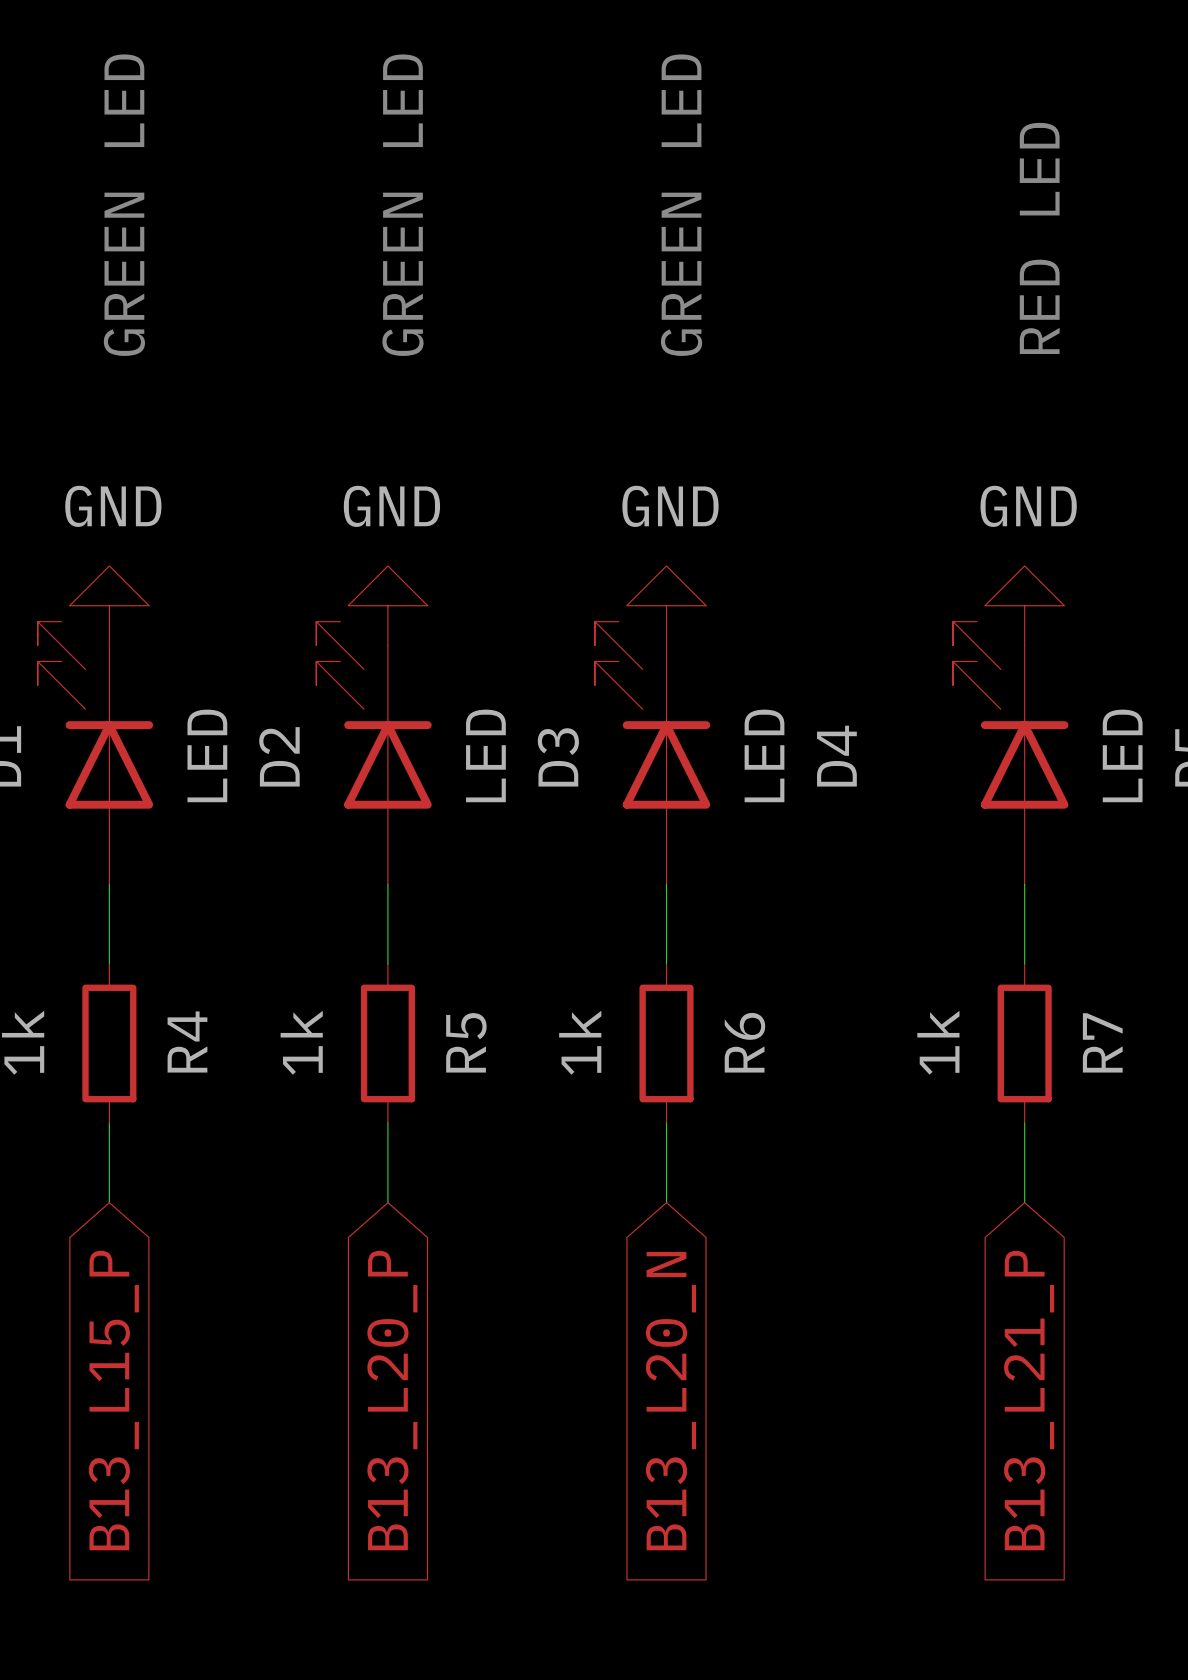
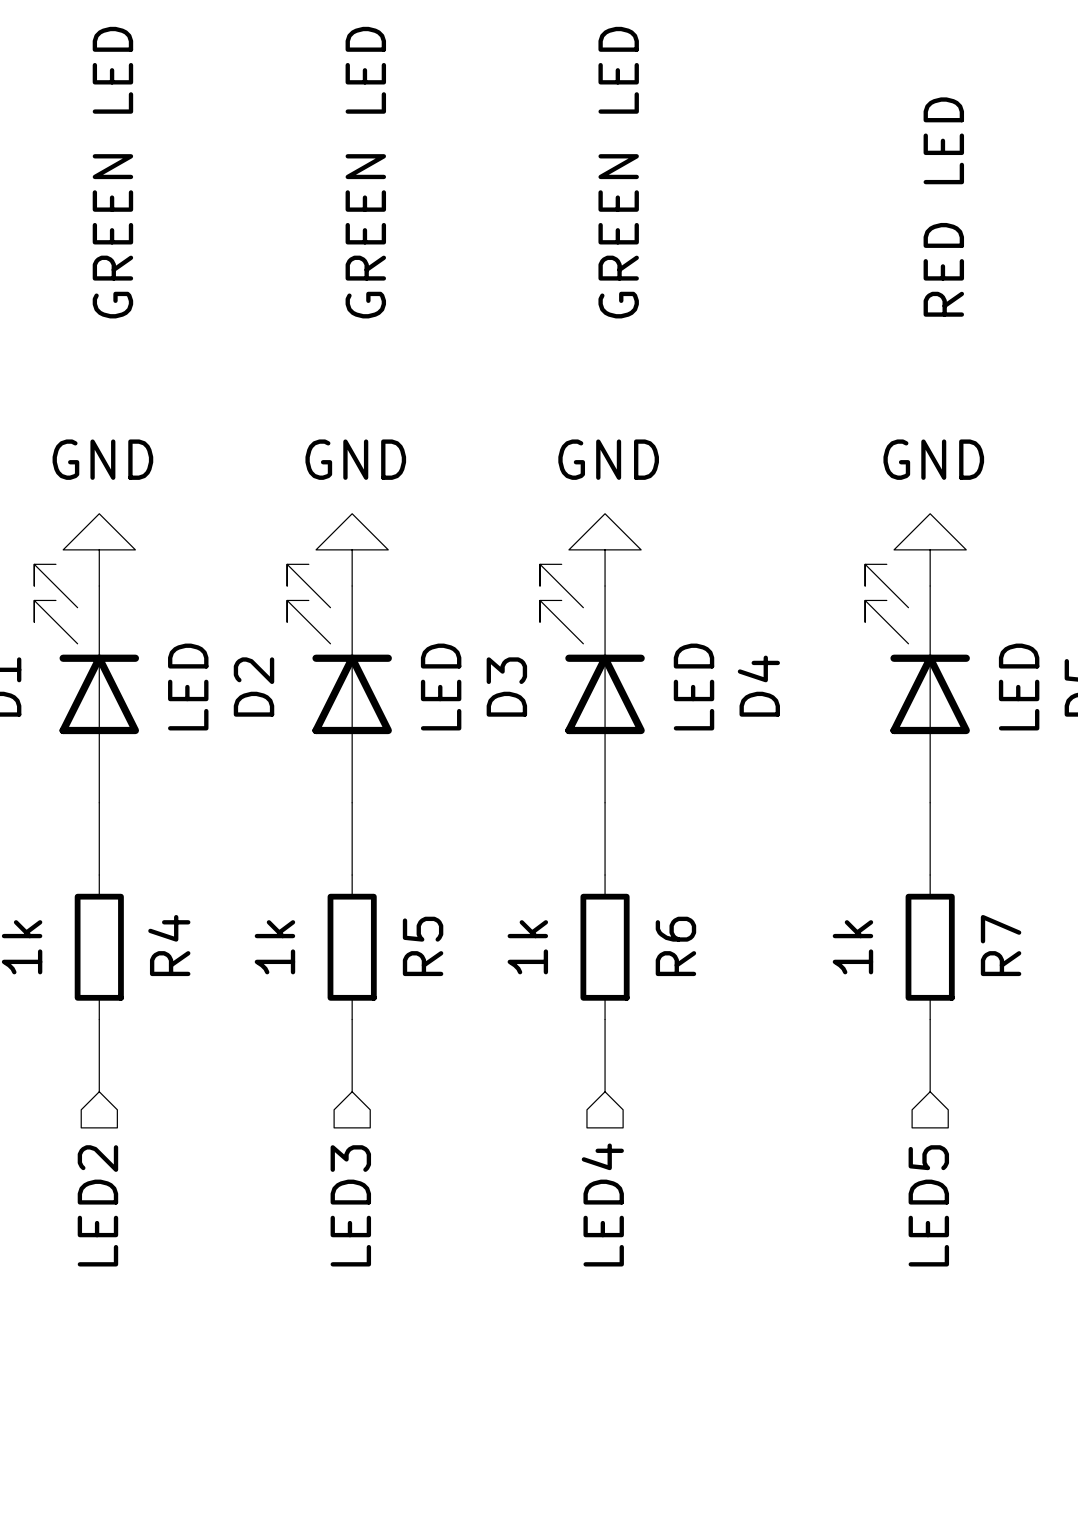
hierarchical label: none -> LED4 (602, 1204)
hierarchical label: none -> LED2 (97, 1205)
hierarchical label: none -> LED3 (350, 1205)
hierarchical label: none -> LED5 (928, 1205)
global label: B13_L15_P (113, 1400) -> none
global label: B13_L20_P (392, 1400) -> none
global label: B13_L21_P (1029, 1400) -> none
global label: B13_L20_N (670, 1401) -> none

